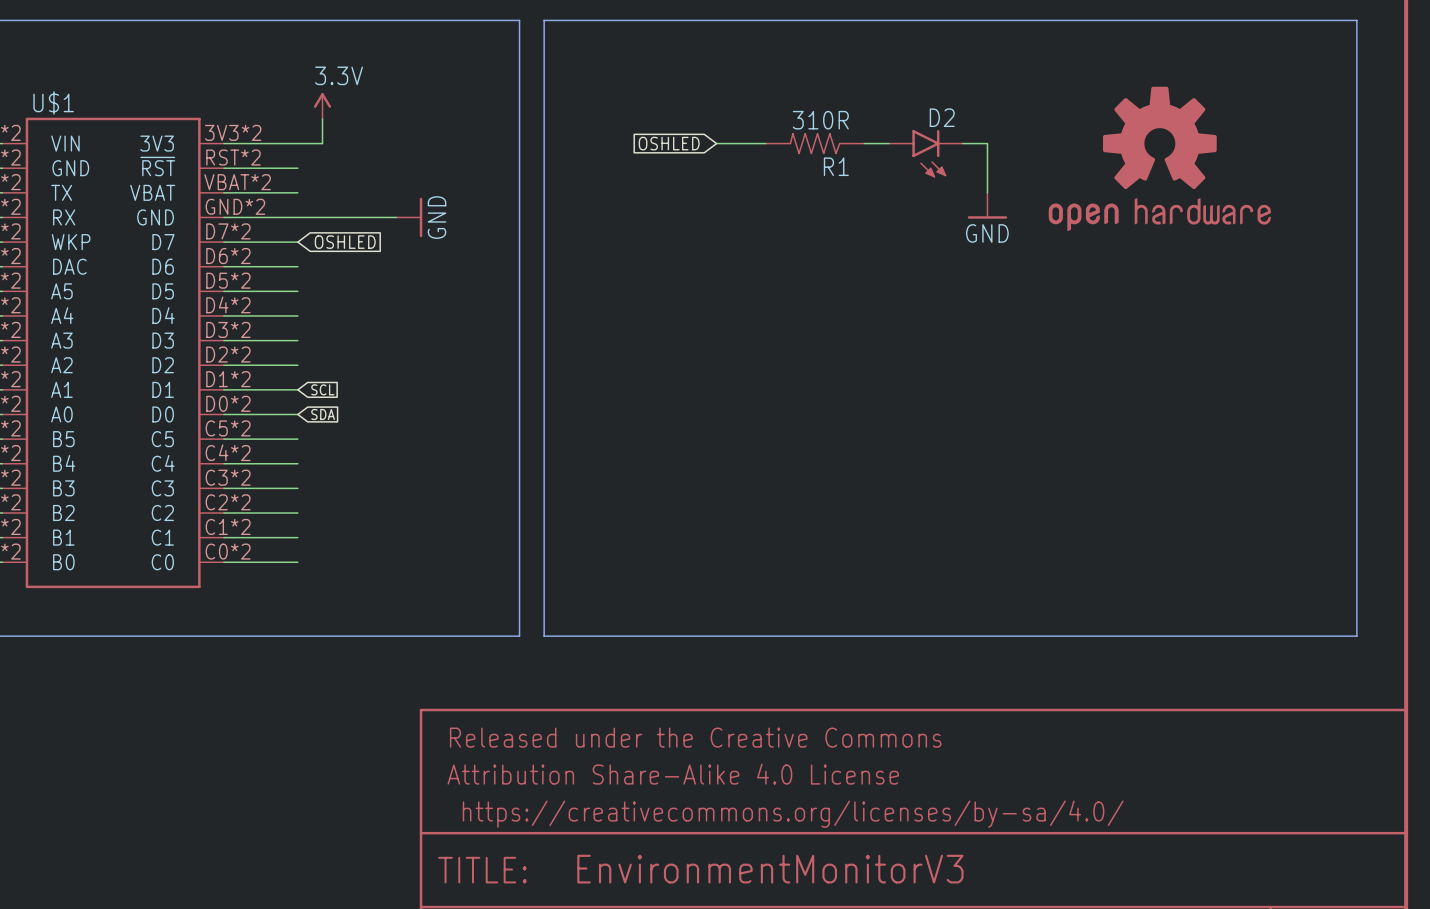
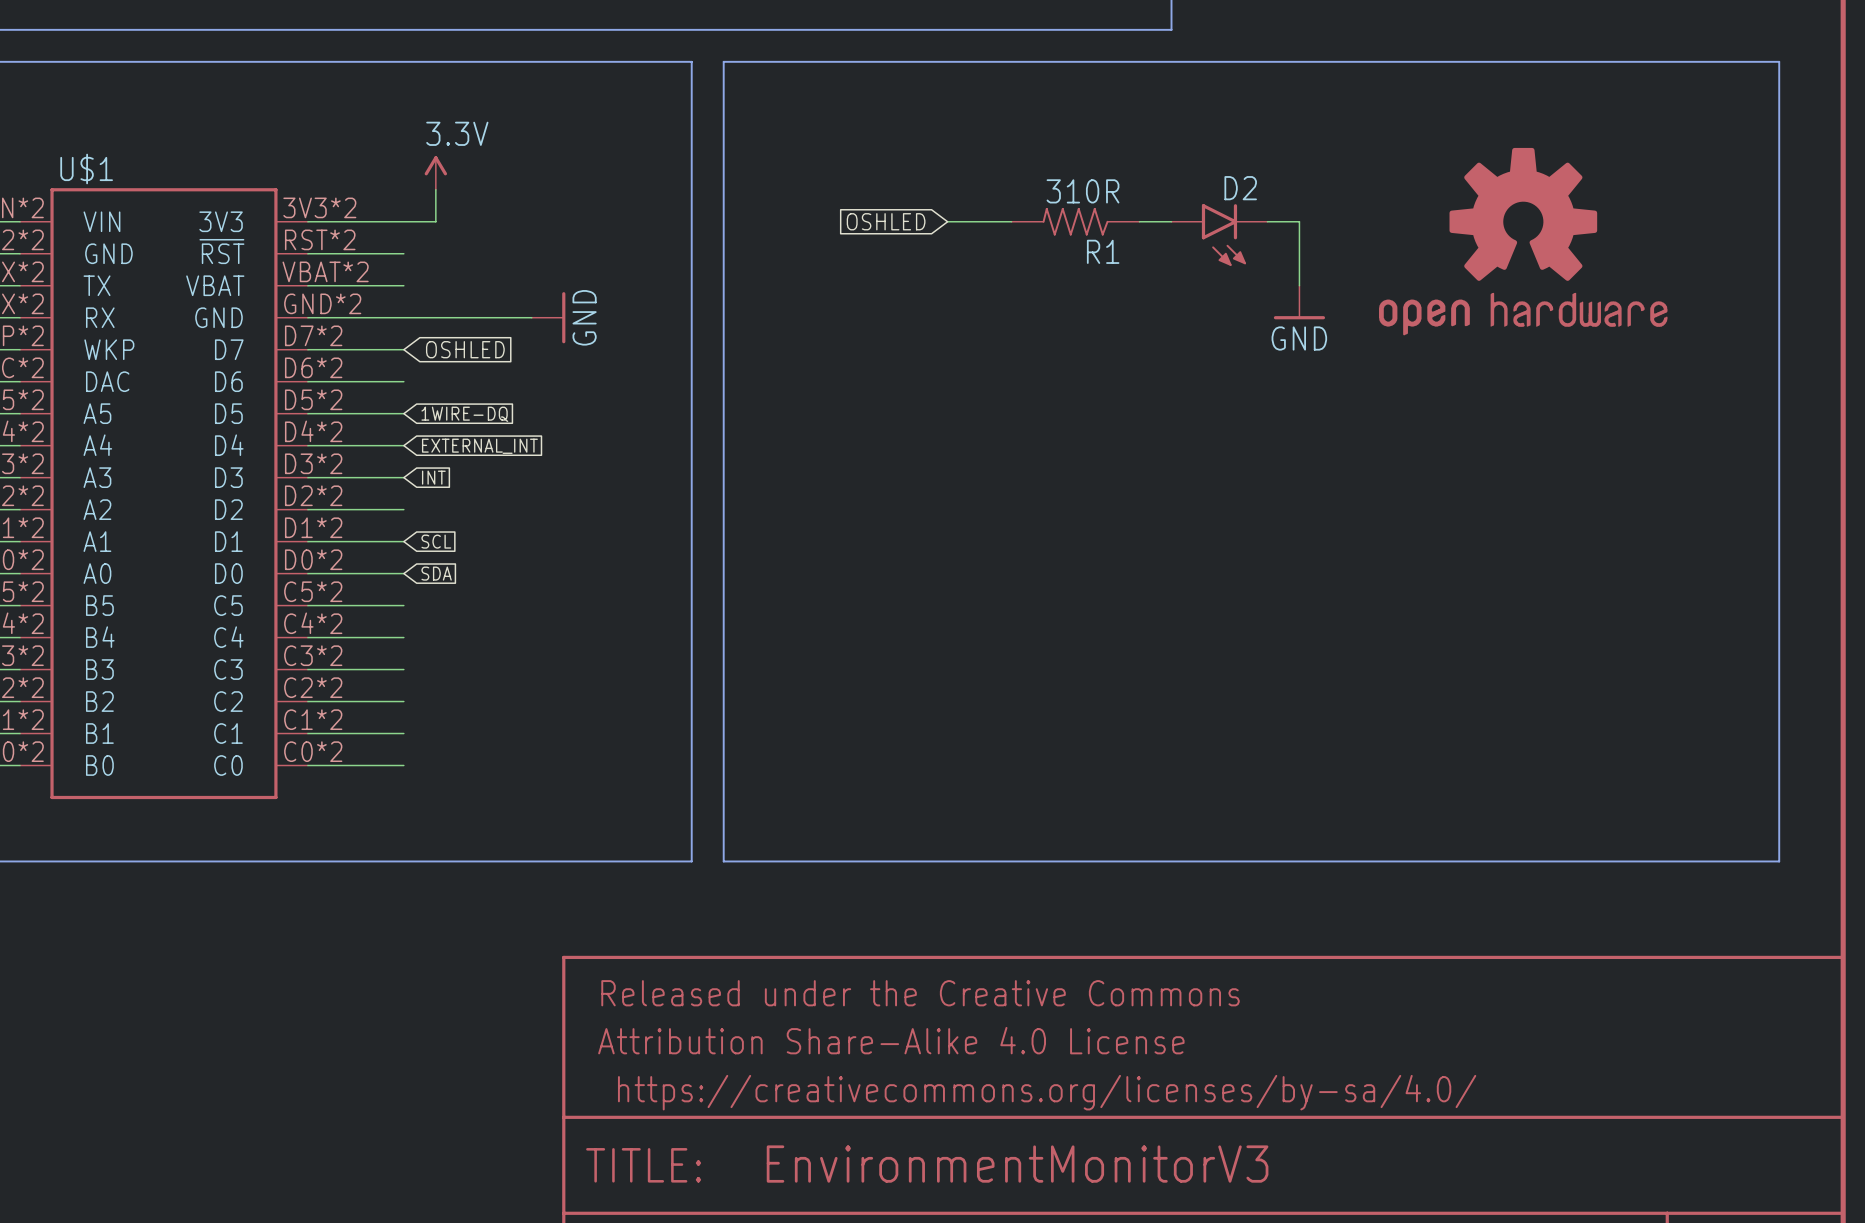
global label: none -> 1WIRE-DQ (464, 414)
global label: none -> EXTERNAL_INT (479, 446)
global label: none -> INT (433, 477)

